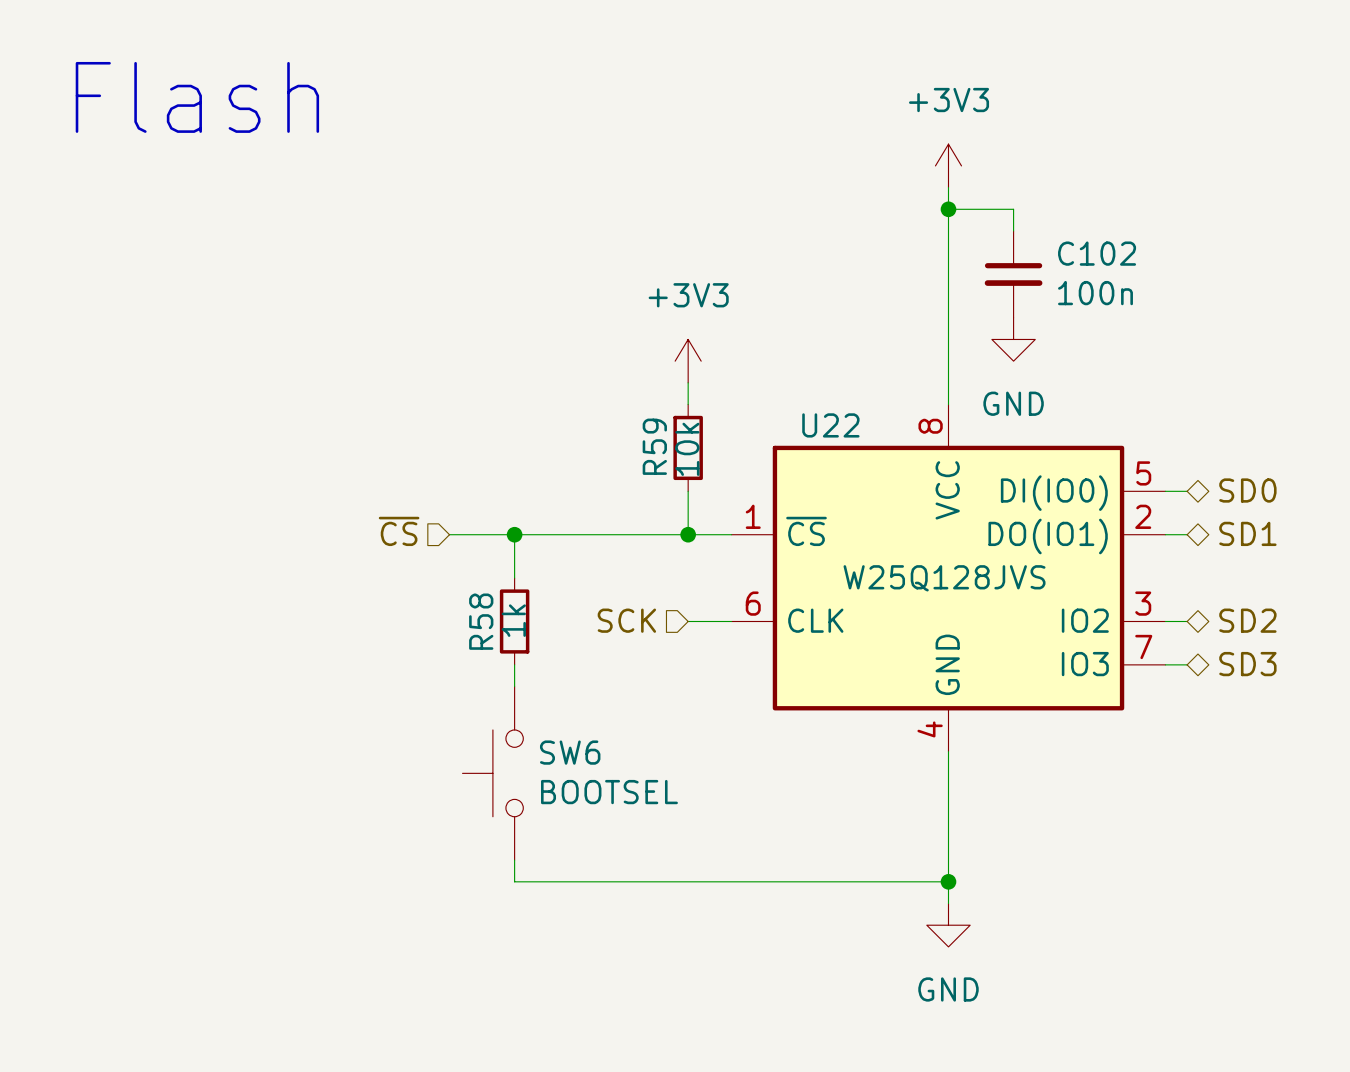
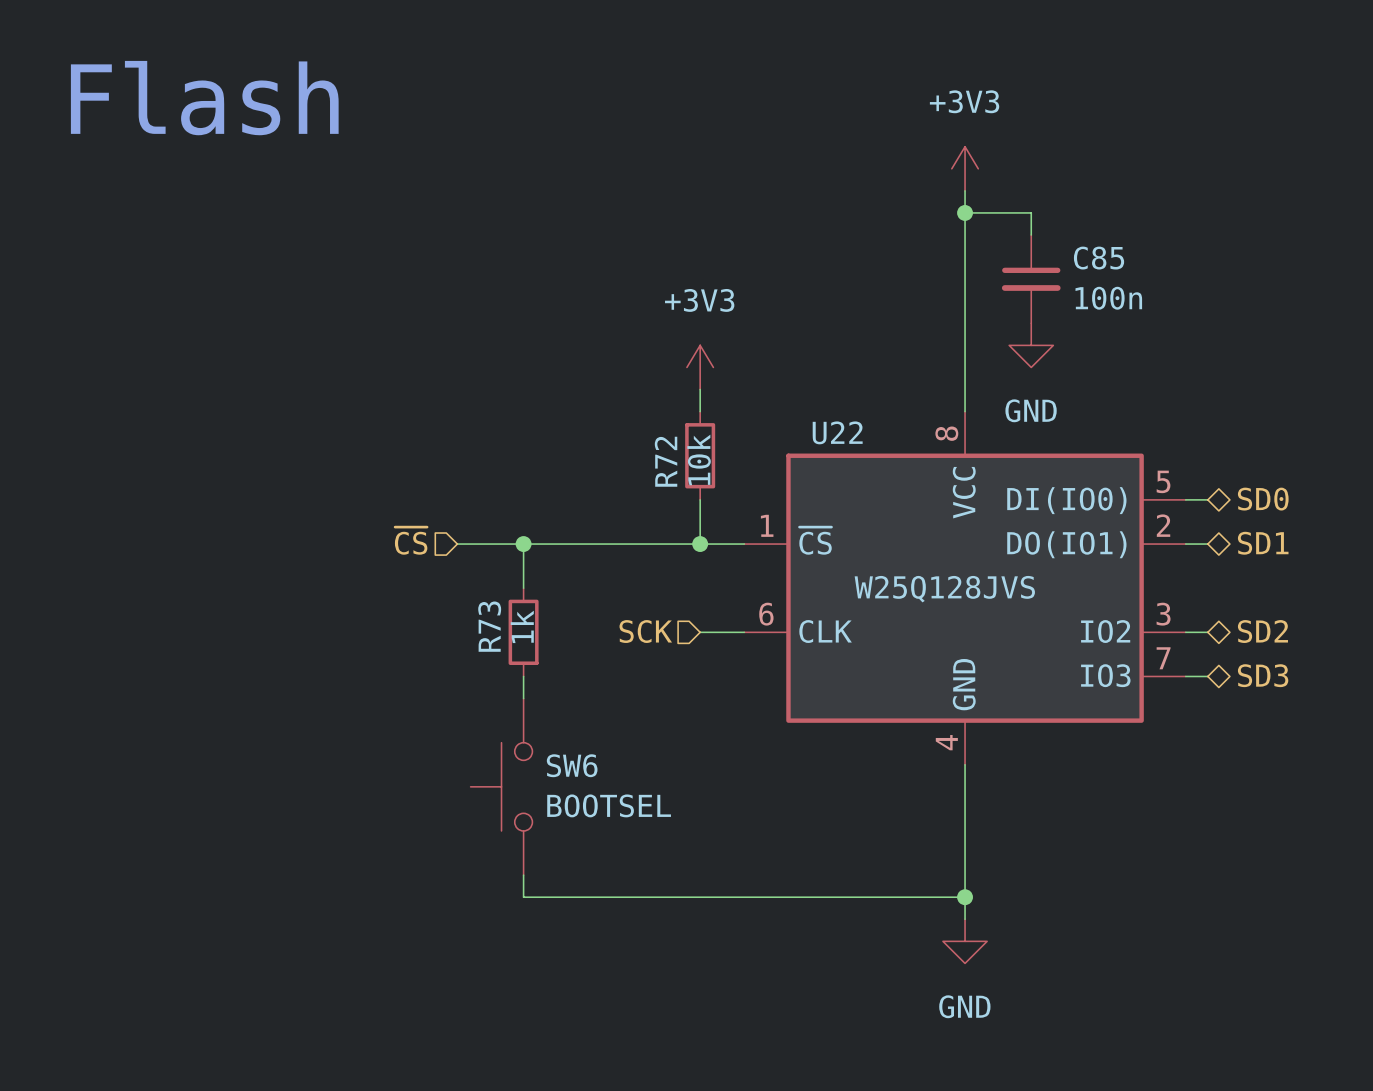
C102 name: C102 (1097, 253) -> C85 (1099, 258)
R59 name: R59 (654, 446) -> R72 (666, 461)
R58 name: R58 (481, 621) -> R73 (489, 626)

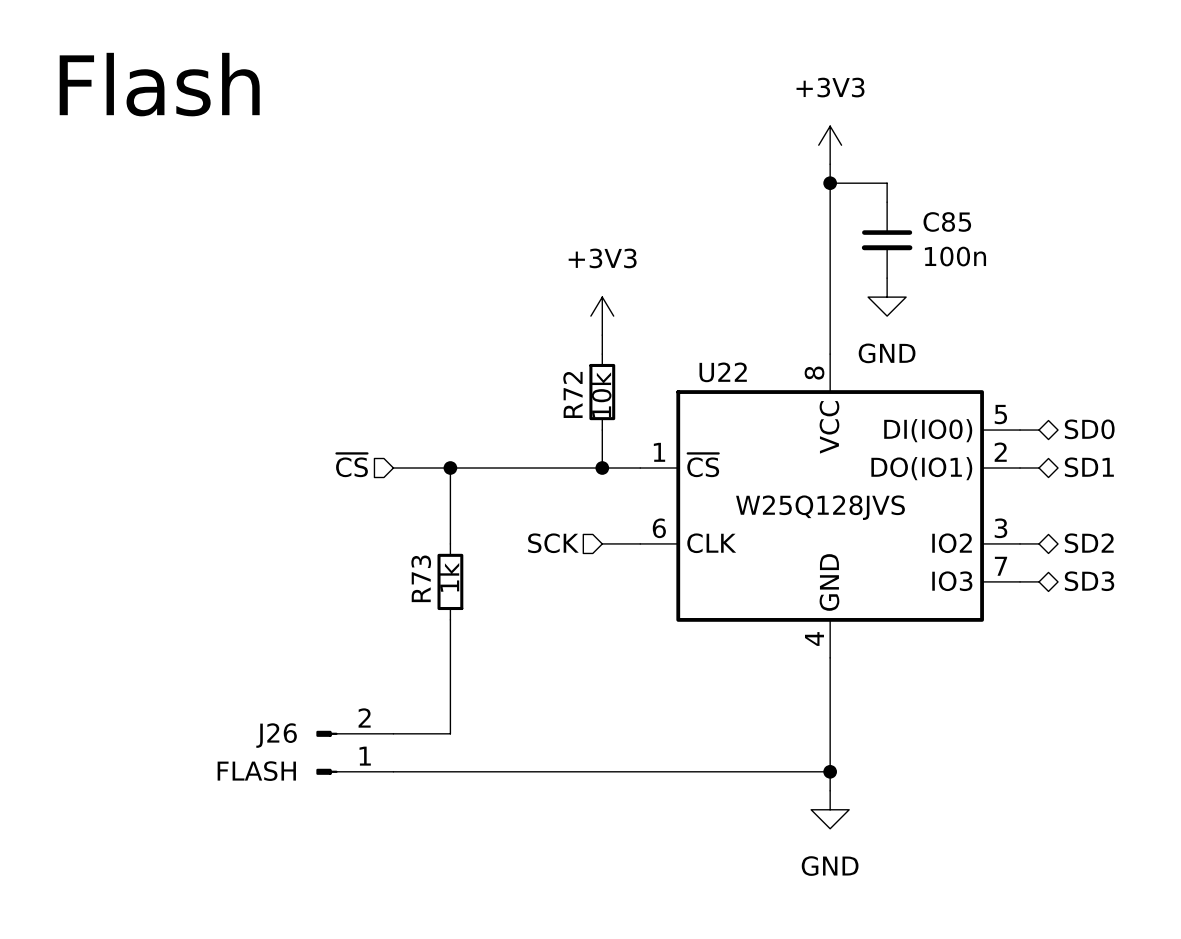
wire: none -> (450, 505) (450, 543)
R73 position: (523, 632) -> (450, 581)
wire: (523, 676) (523, 698) -> none
wire: none -> (450, 619) (450, 733) (393, 733)
SW6: BOOTSEL (501, 786) -> none
J26: none -> FLASH (354, 752)
wire: (523, 875) (523, 897) -> (393, 771) (450, 771)

